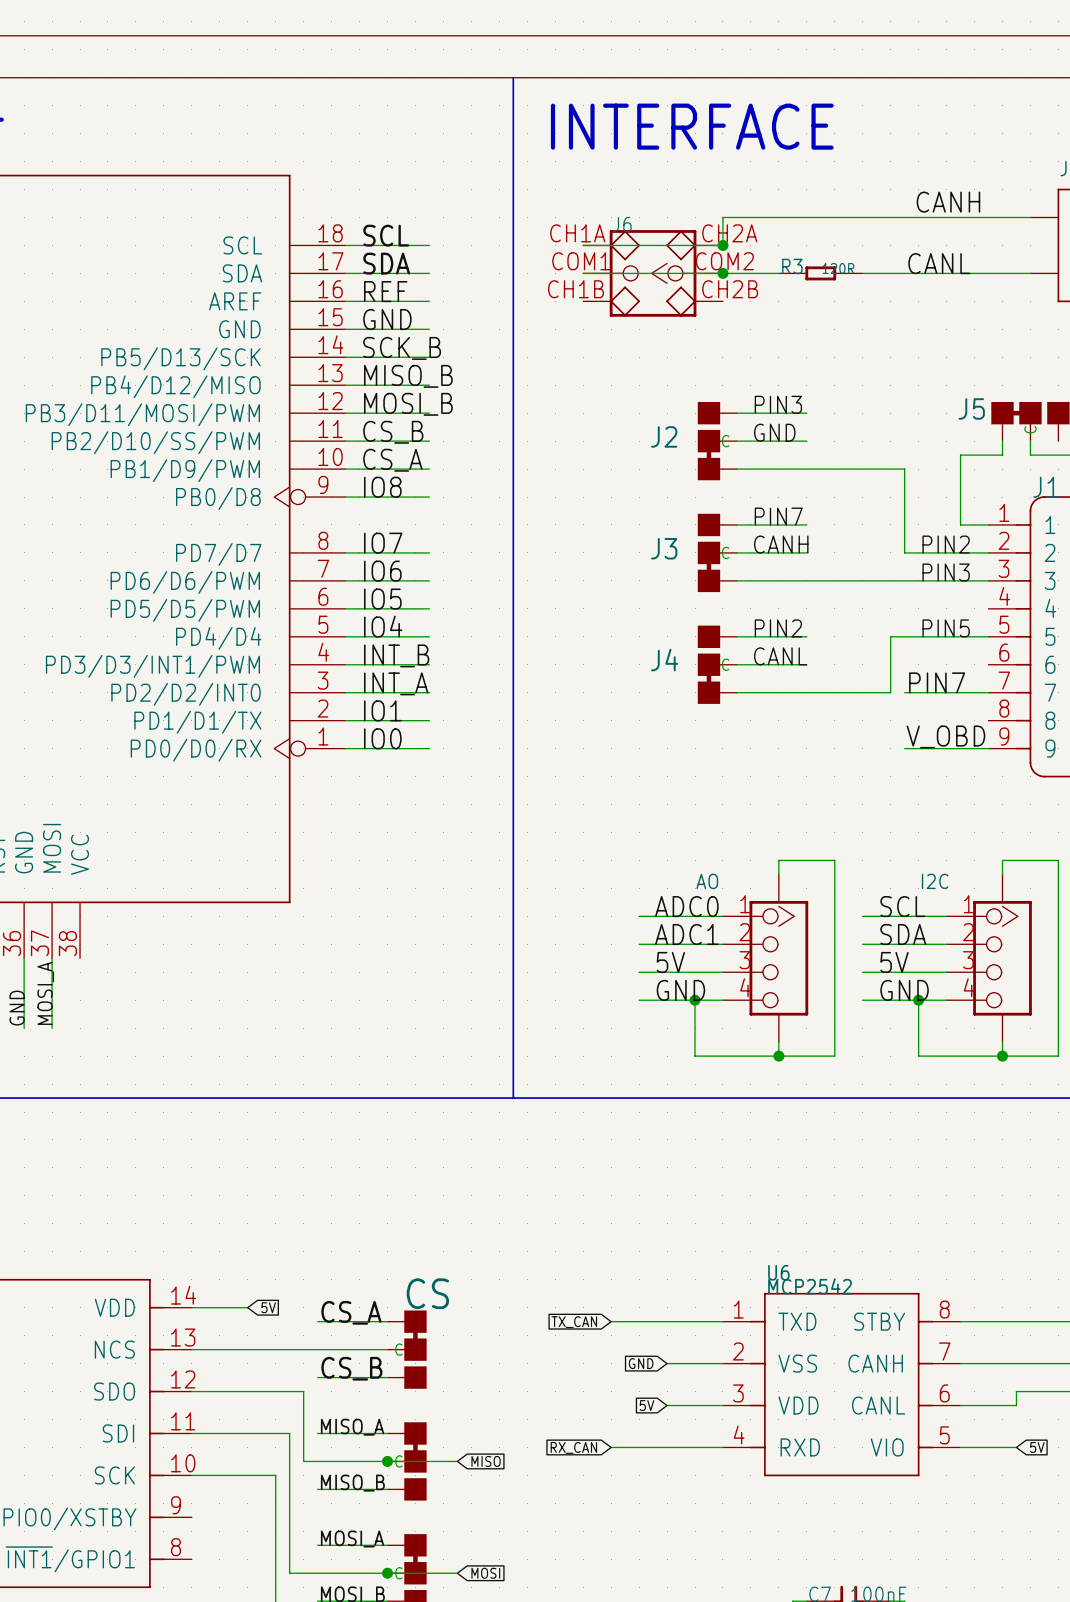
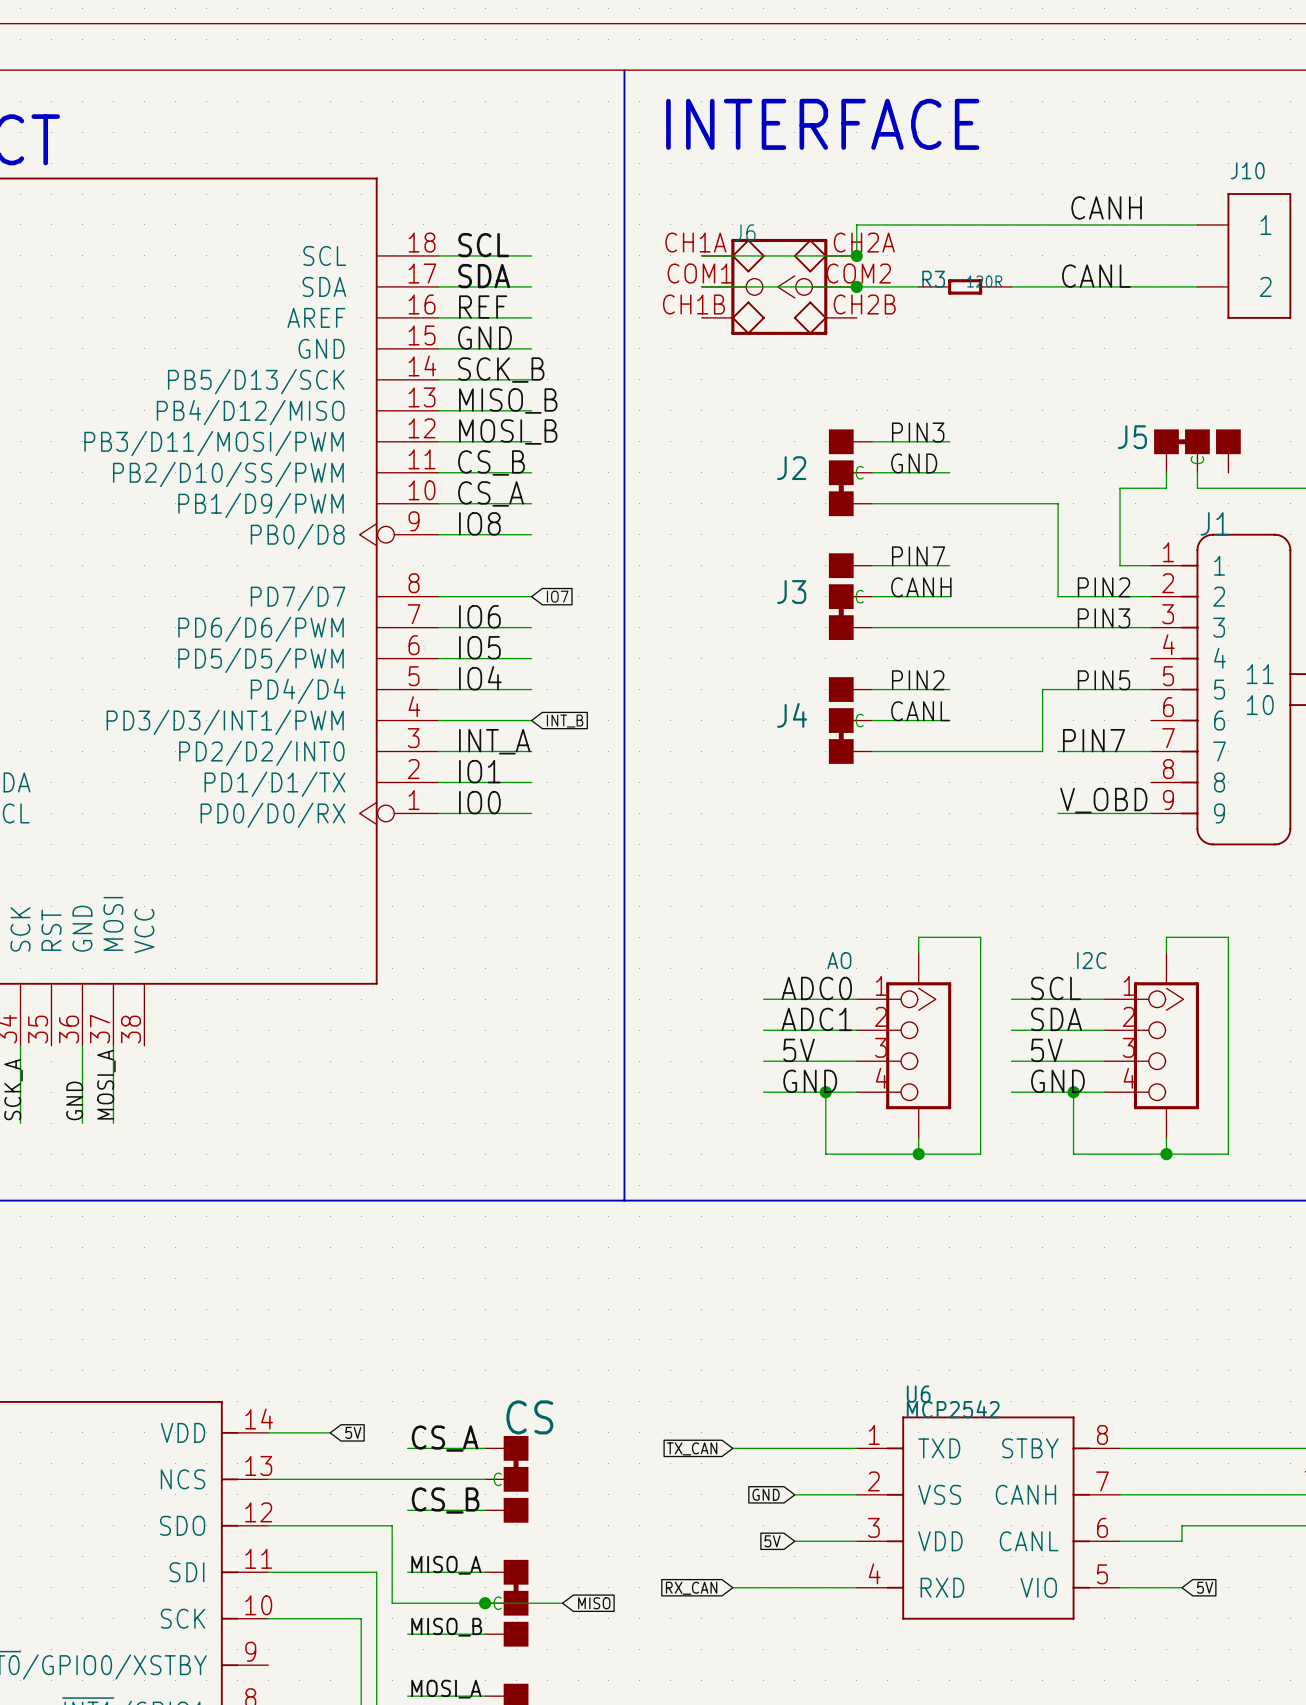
label: IO7 (383, 543) -> none
global label: none -> IO7 (557, 596)
label: INT_B (396, 655) -> none
global label: none -> INT_B (565, 721)

